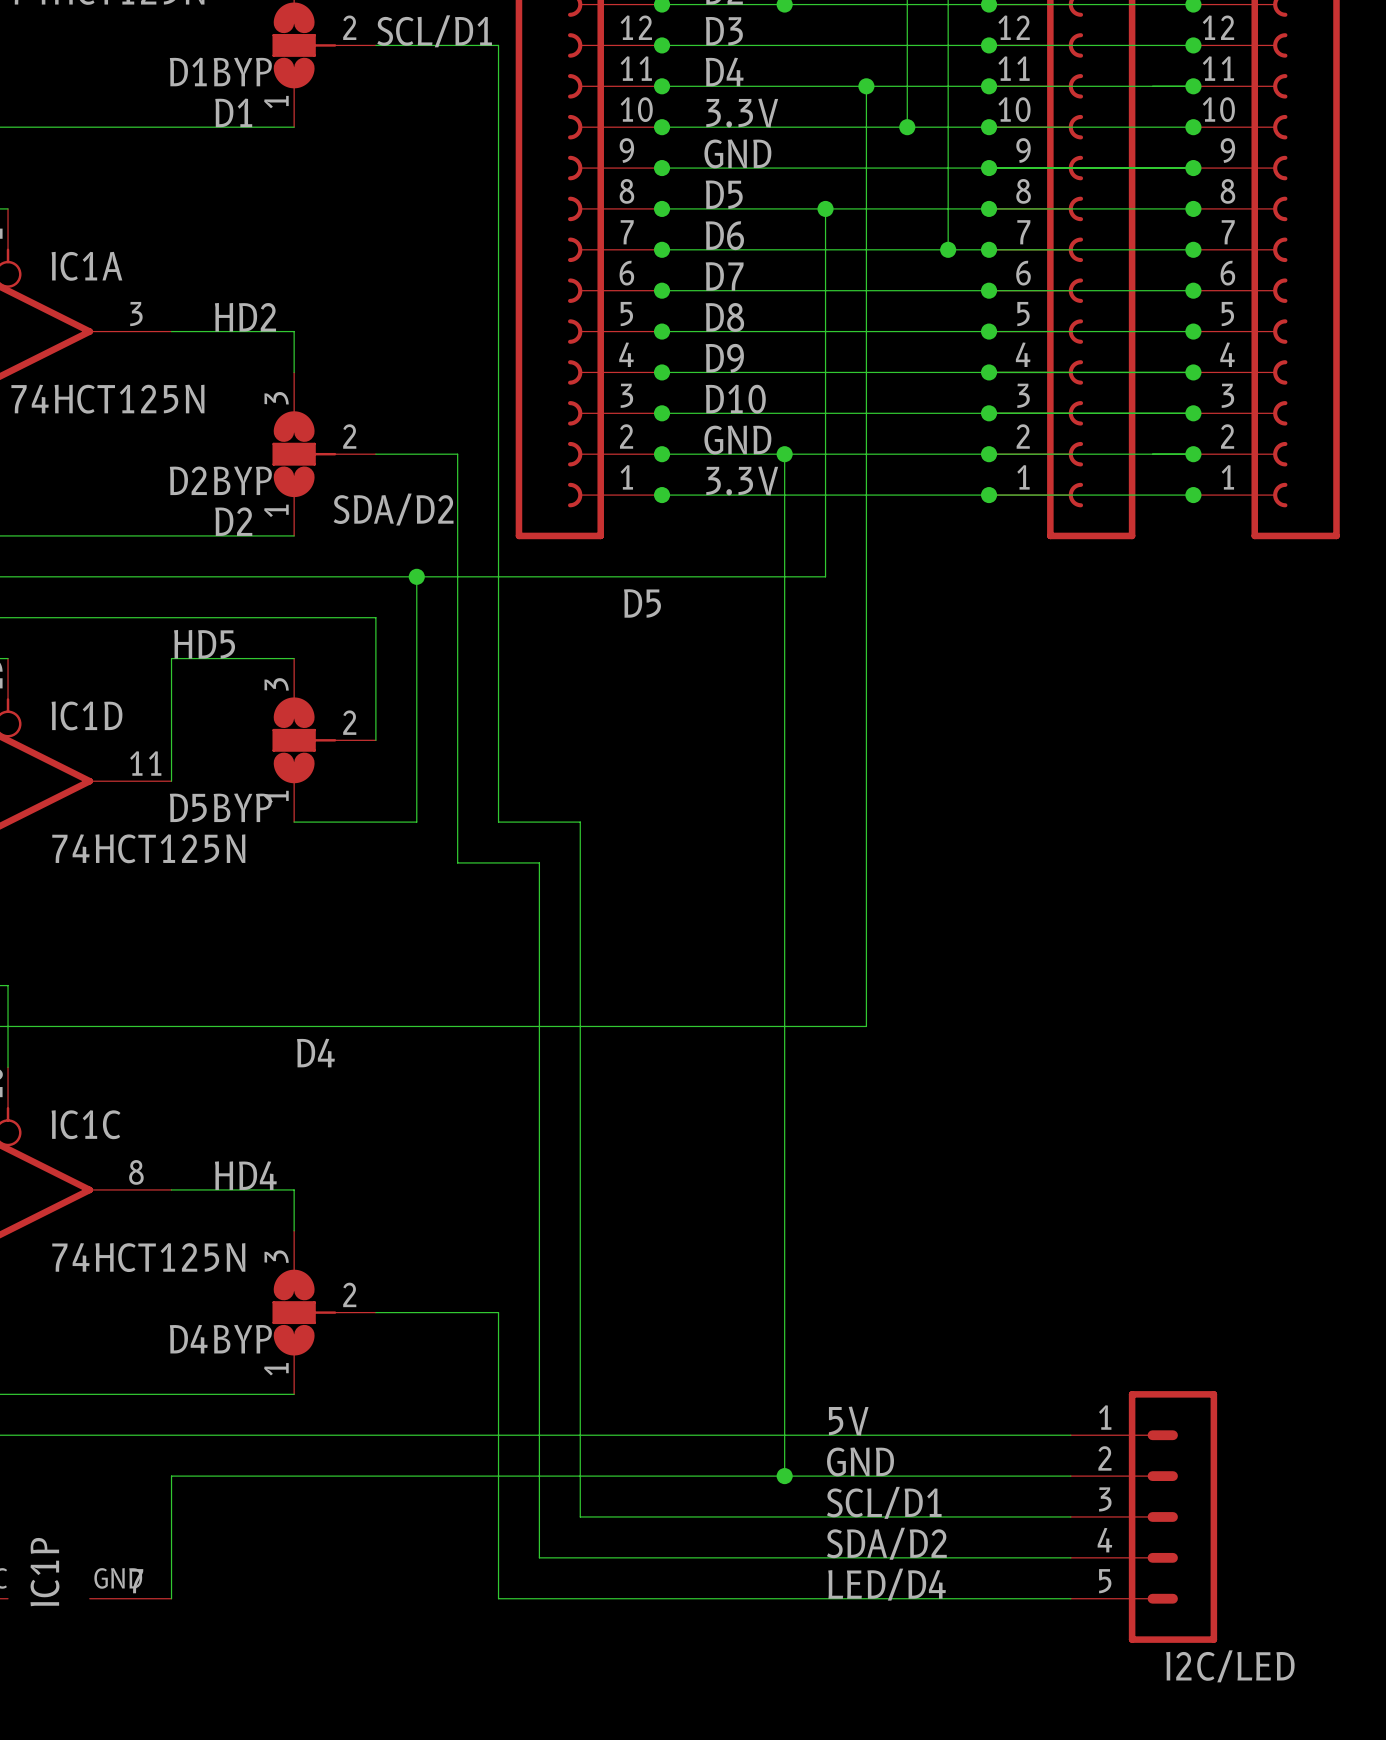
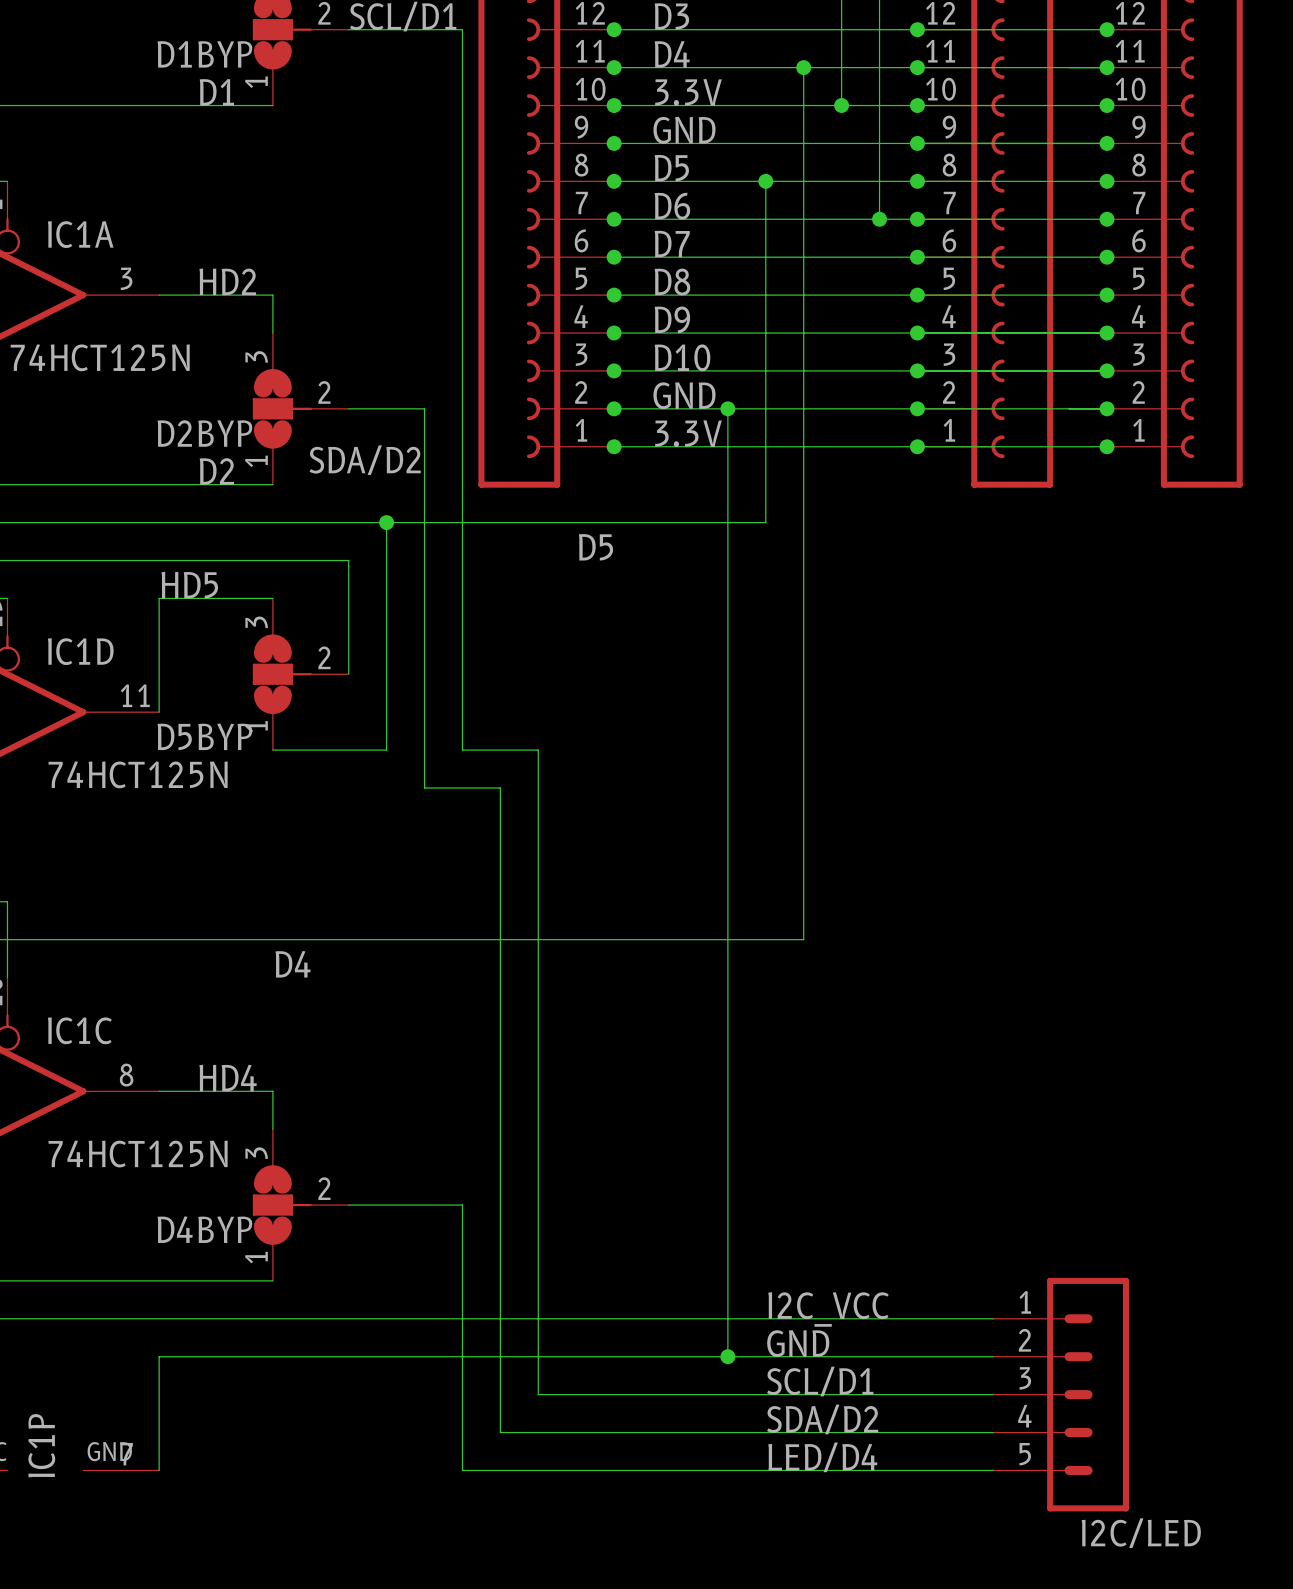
label: 5V (848, 1421) -> I2C_VCC (828, 1309)

